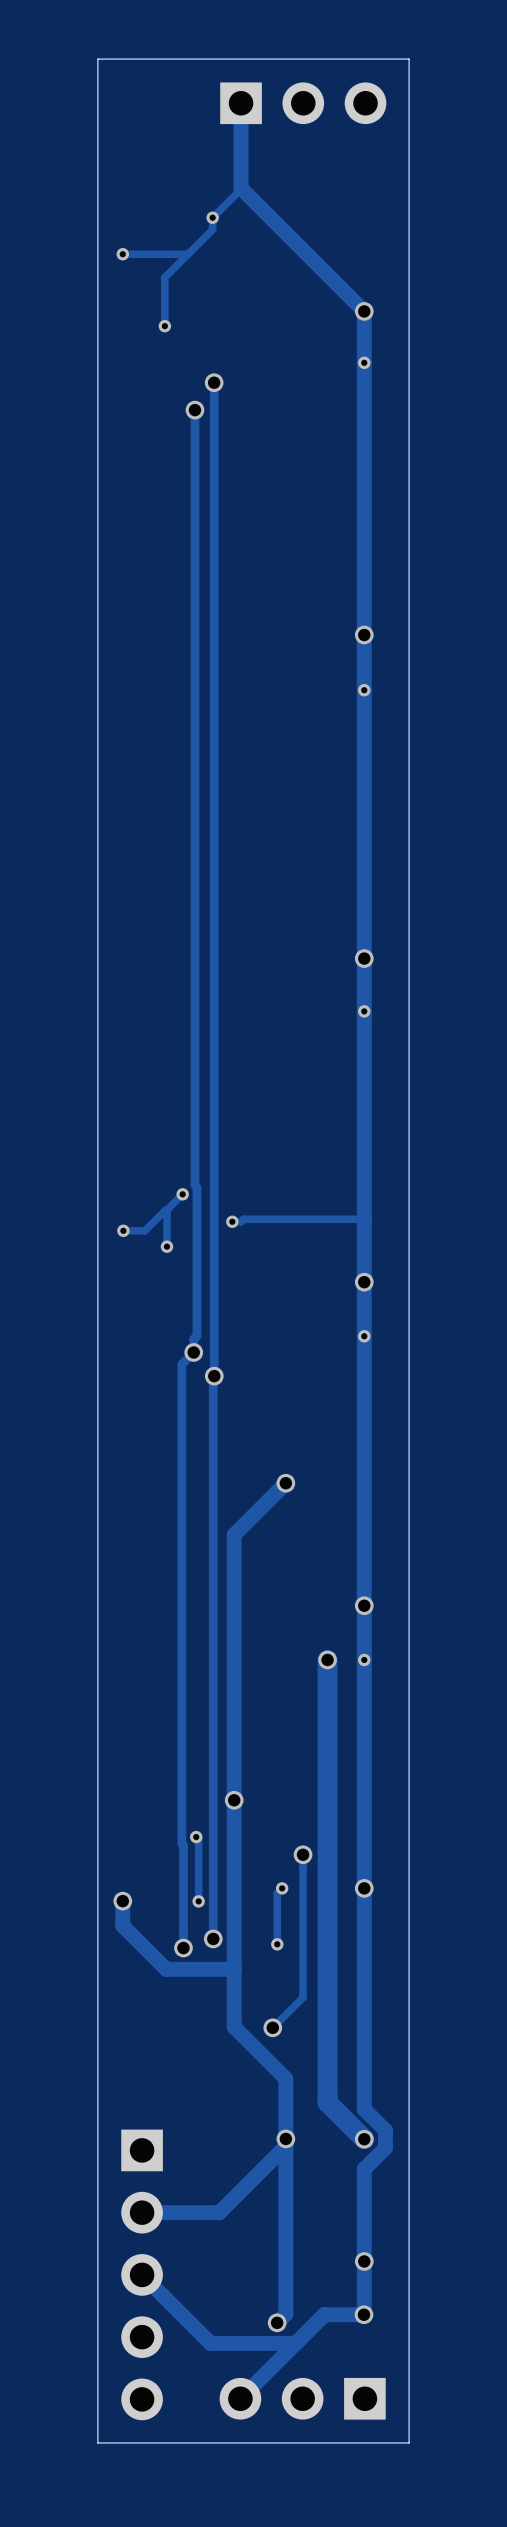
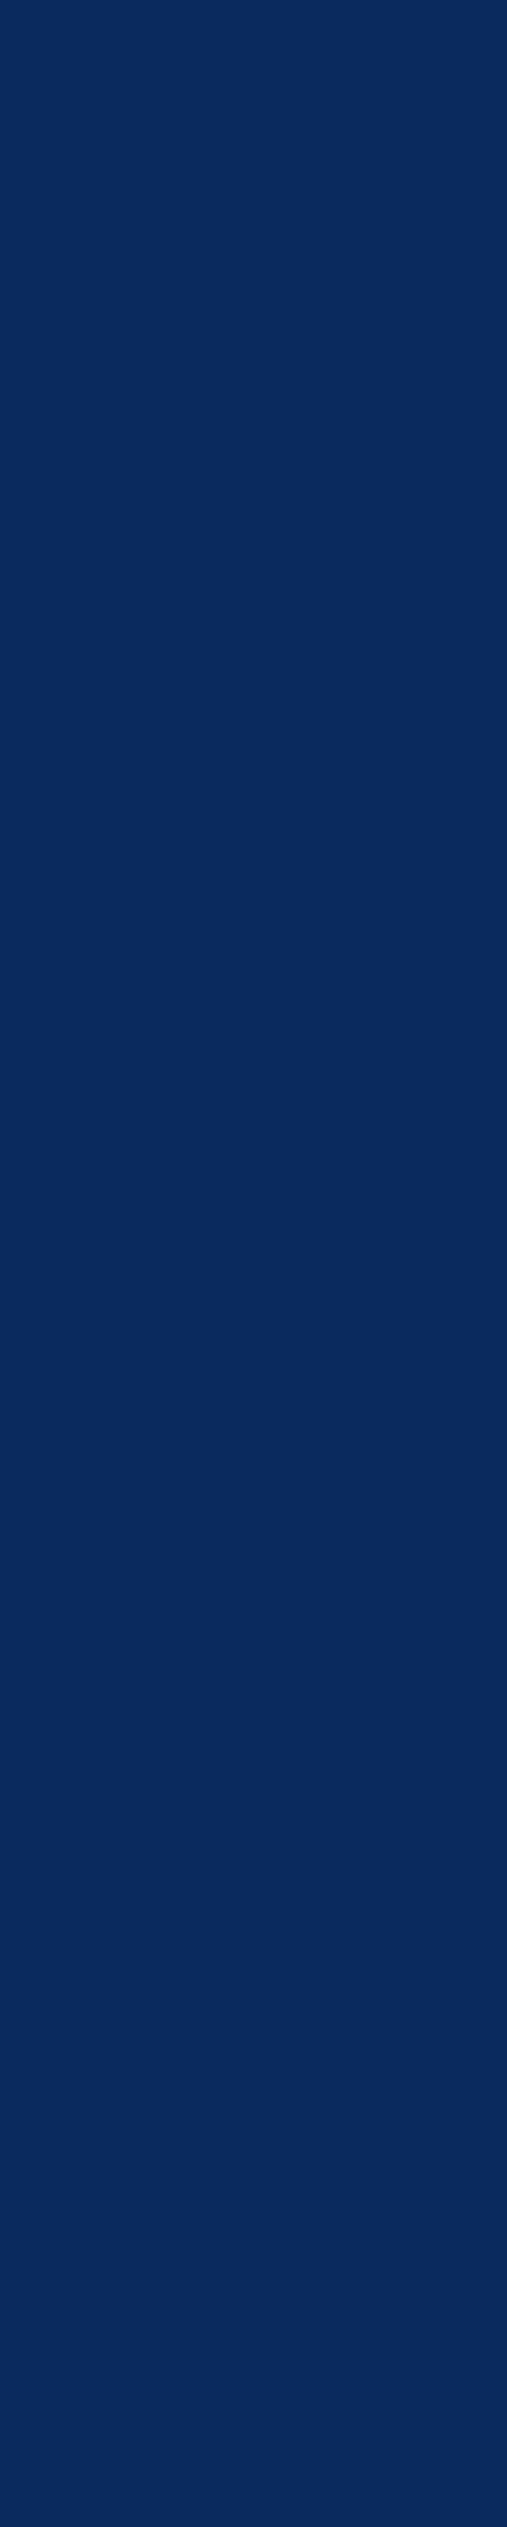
board edge: (409, 59) (97, 59) (97, 2442) (409, 2442) (409, 59) -> none
track: (241, 103) (241, 188) -> none
part: (303, 103) -> none
track: (241, 188) (364, 311) (364, 2109) (385, 2130) (385, 2147) (364, 2169) (364, 2314) -> none
track: (241, 188) (212, 217) (212, 229) (164, 277) (164, 326) -> none
via: (212, 217) -> none
via: (122, 254) -> none
track: (188, 254) (122, 254) -> none
via: (364, 311) -> none
via: (164, 326) -> none
via: (364, 362) -> none
track: (214, 382) (213, 1938) -> none
via: (214, 382) -> none
track: (194, 410) (194, 1185) (196, 1187) (196, 1336) (193, 1339) (193, 1352) (181, 1364) (183, 1948) -> none
via: (194, 410) -> none
via: (364, 635) -> none
via: (364, 690) -> none
via: (364, 958) -> none
via: (364, 1011) -> none
track: (182, 1194) (166, 1210) -> none
via: (182, 1194) -> none
track: (166, 1210) (166, 1246) -> none
track: (166, 1210) (144, 1230) (123, 1230) -> none
track: (364, 1219) (243, 1219) (241, 1221) (232, 1221) -> none
via: (232, 1221) -> none
via: (123, 1230) -> none
via: (166, 1246) -> none
via: (364, 1282) -> none
via: (364, 1336) -> none
via: (193, 1352) -> none
via: (214, 1376) -> none
track: (285, 1483) (234, 1534) (234, 2027) (285, 2078) (285, 2314) (277, 2322) -> none
via: (285, 1483) -> none
via: (364, 1605) -> none
track: (327, 1659) (327, 2102) (364, 2139) -> none
via: (327, 1659) -> none
via: (364, 1659) -> none
via: (234, 1800) -> none
track: (196, 1837) (198, 1839) (198, 1901) -> none
via: (196, 1837) -> none
track: (303, 1854) (303, 1997) (272, 2027) -> none
via: (303, 1854) -> none
track: (282, 1888) (277, 1893) (277, 1944) -> none
via: (282, 1888) -> none
via: (364, 1888) -> none
track: (122, 1901) (122, 1925) (166, 1969) (234, 1969) -> none
via: (122, 1901) -> none
via: (198, 1901) -> none
via: (213, 1938) -> none
via: (277, 1944) -> none
via: (183, 1948) -> none
via: (272, 2027) -> none
via: (285, 2138) -> none
via: (364, 2139) -> none
track: (285, 2146) (219, 2212) (142, 2212) -> none
via: (364, 2261) -> none
track: (142, 2274) (210, 2343) (295, 2343) -> none
part: (142, 2274) -> none
track: (363, 2314) (324, 2314) (240, 2398) -> none
via: (363, 2314) -> none
via: (277, 2322) -> none
part: (302, 2398) -> none

